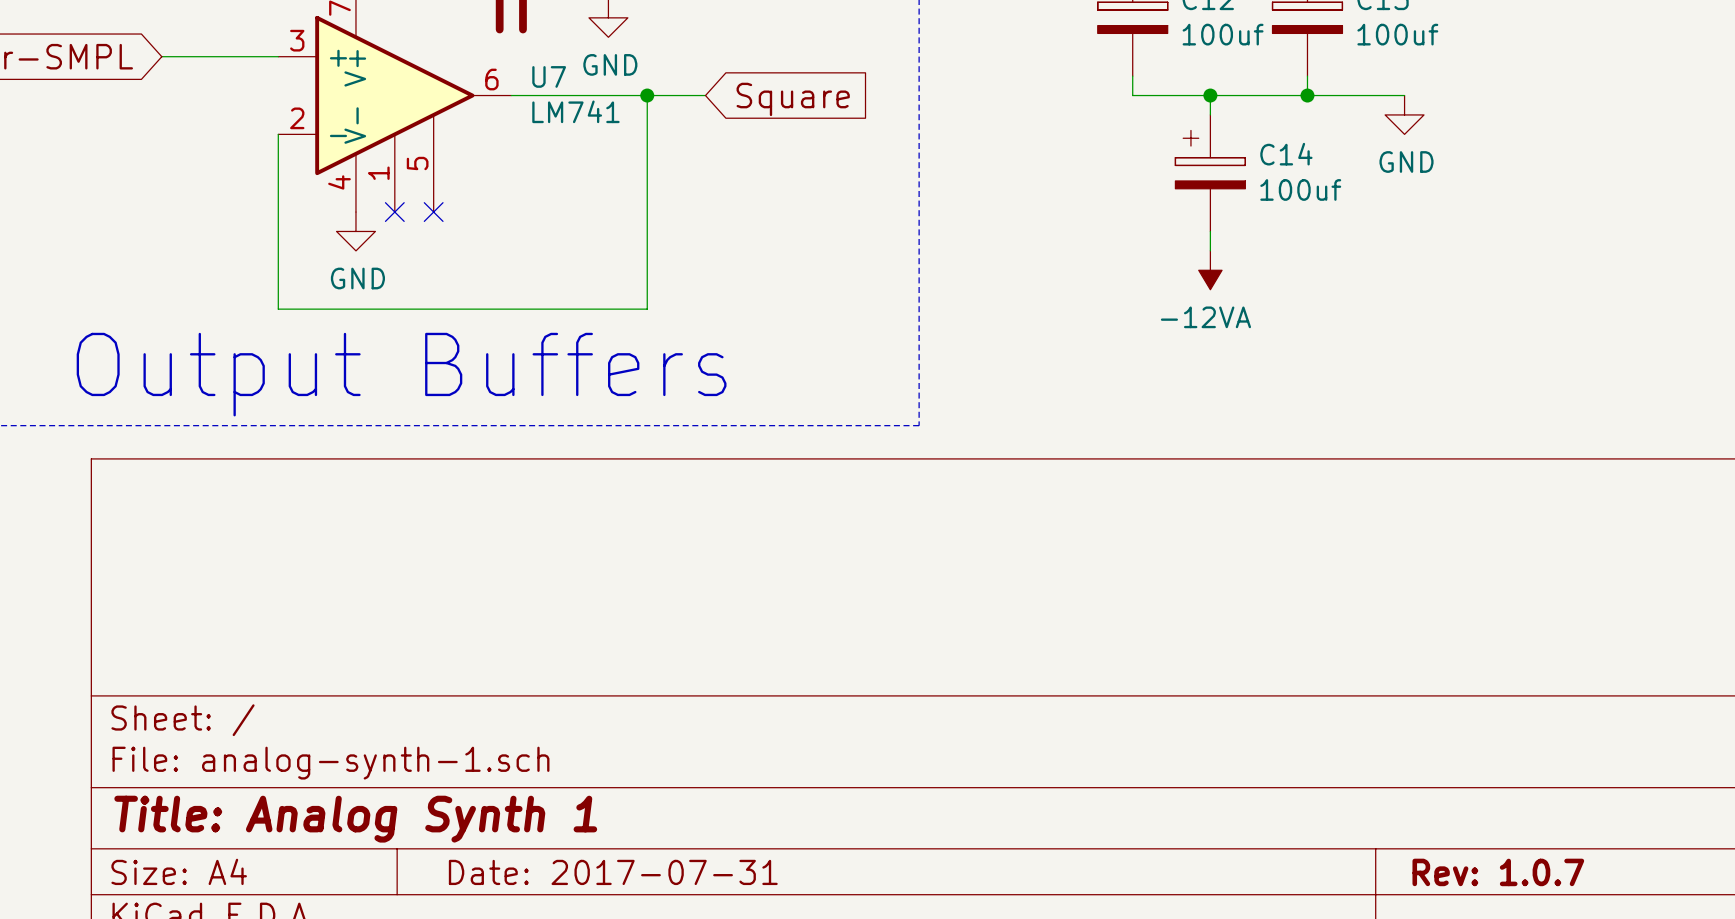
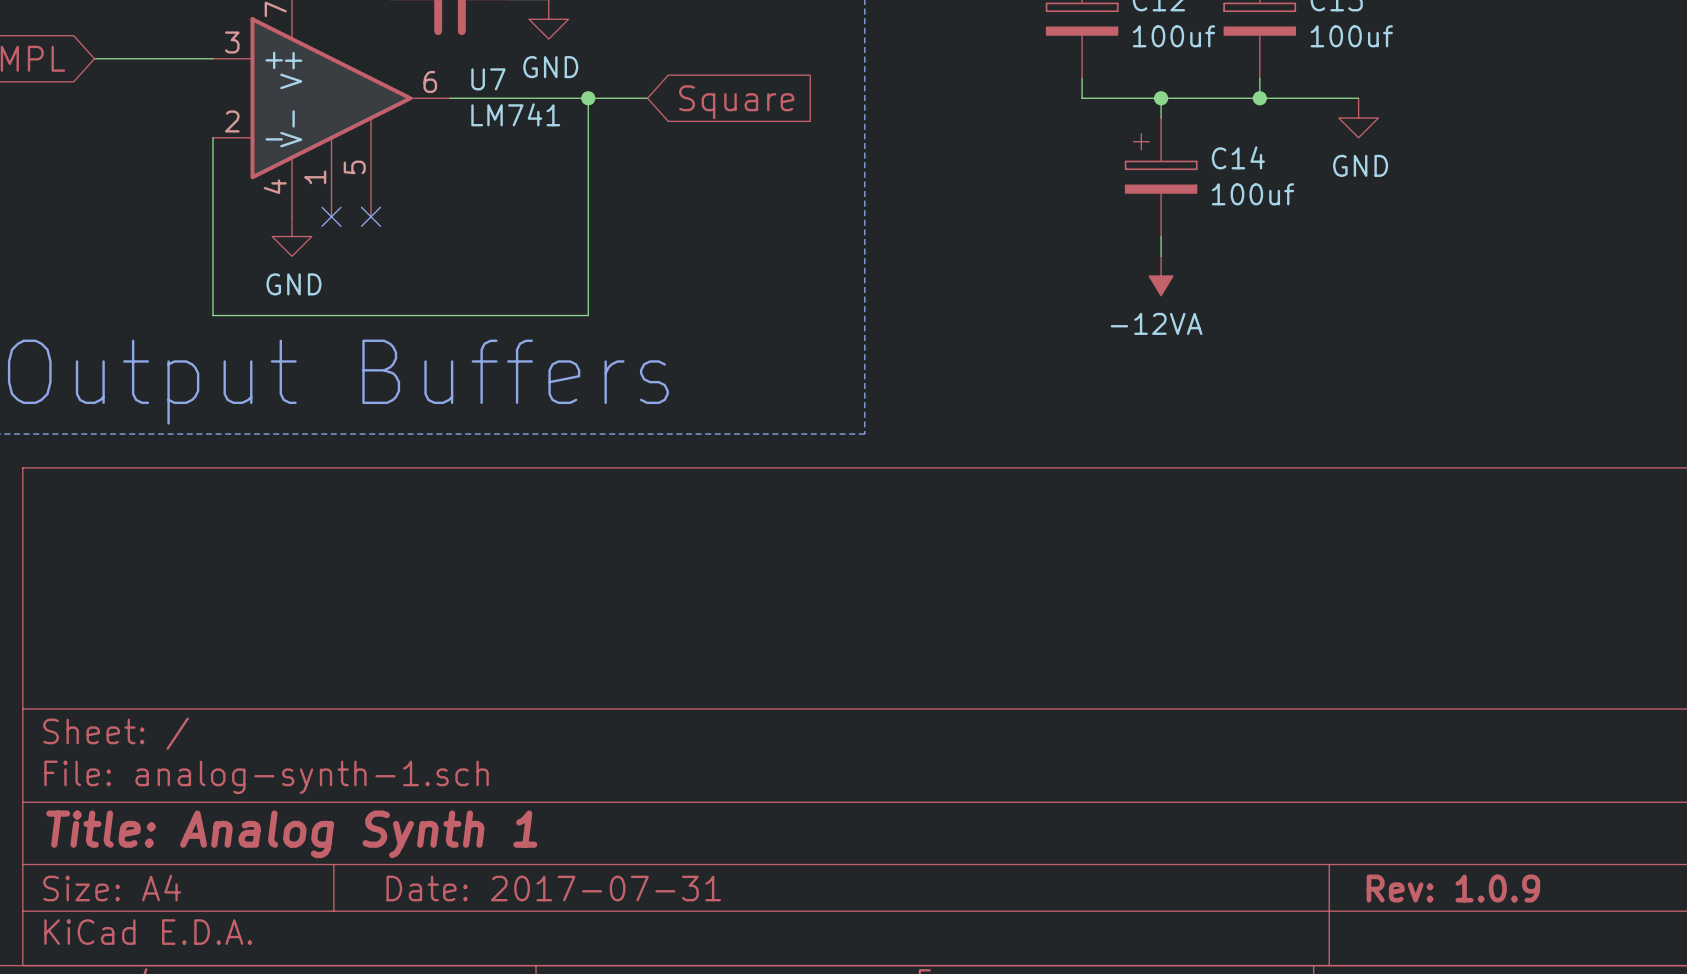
title block: Rev: 1.0.7 (1498, 872) -> Rev: 1.0.9 (1453, 888)

